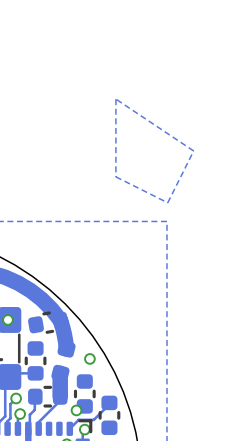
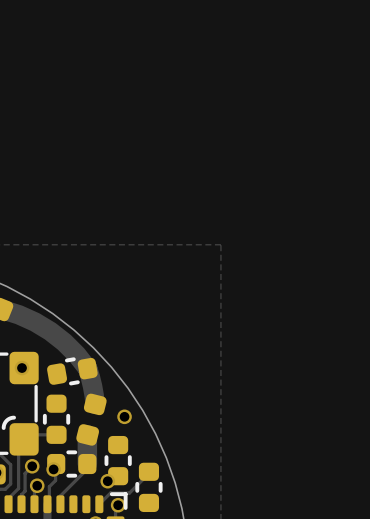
zone outline: (115, 99) (193, 150) (167, 202) (115, 176) (115, 99) -> none
via: none -> (53, 469)

